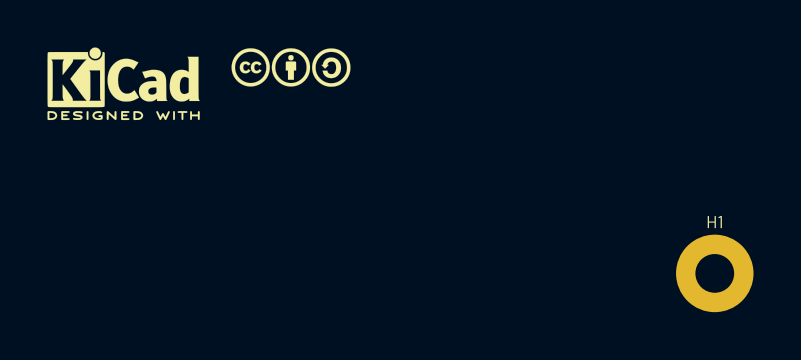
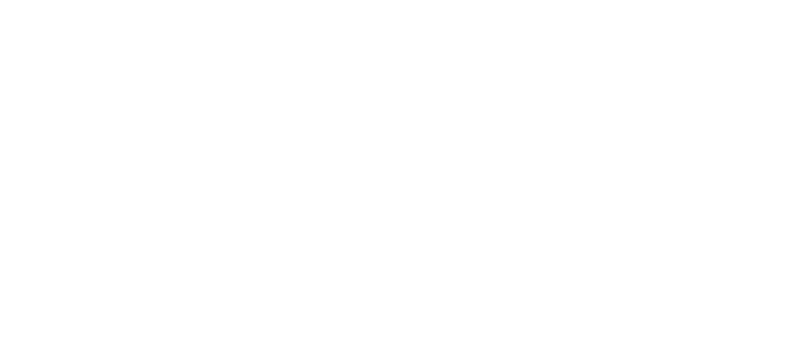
drawing: [47, 47, 200, 121] -> none
drawing: [231, 48, 351, 87] -> none
H1: (714, 273) -> none

